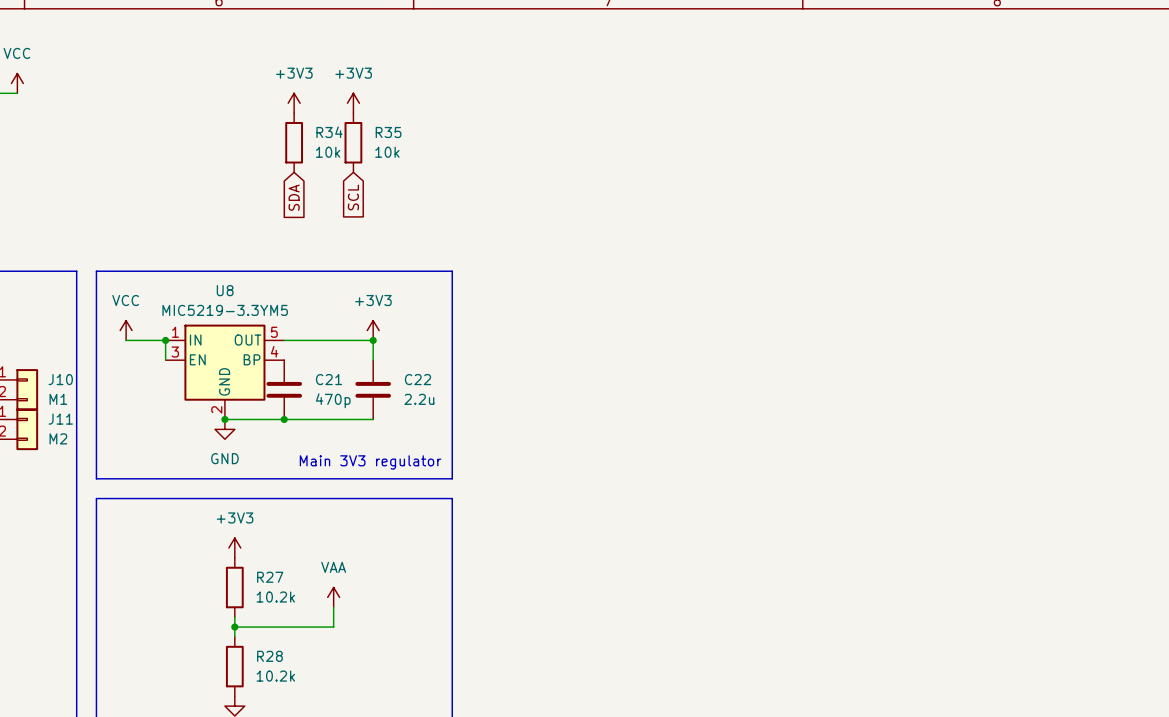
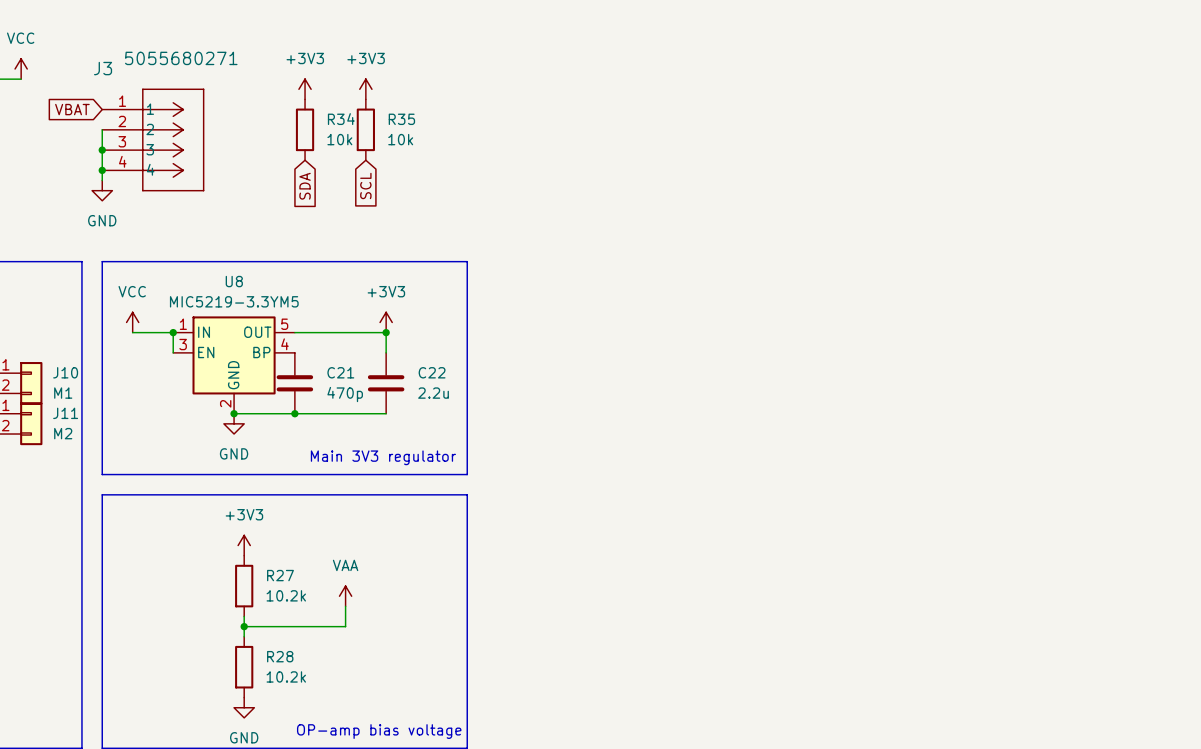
global label: none -> VBAT (72, 109)
wire: none -> (102, 129) (102, 180)
J3: none -> 5055680271 (153, 139)
junction: none -> (102, 150)
junction: none -> (102, 170)
power symbol: none -> GND (102, 190)

